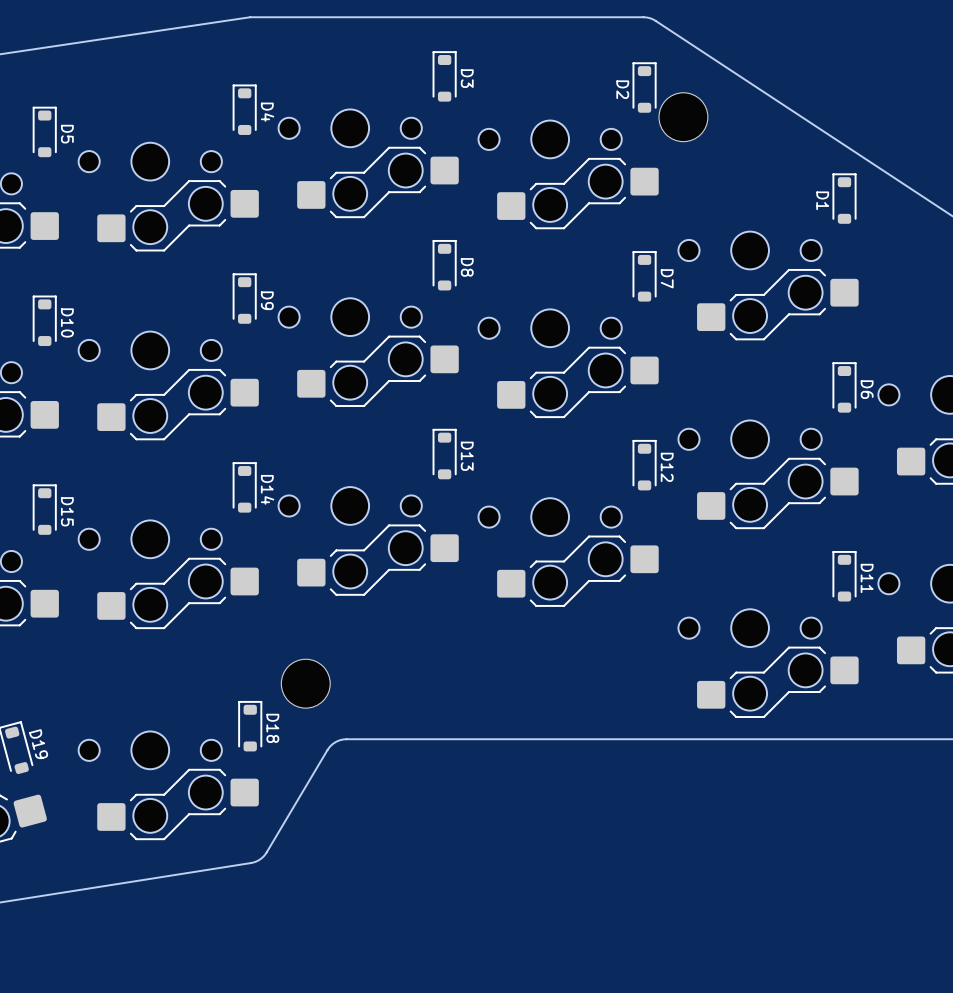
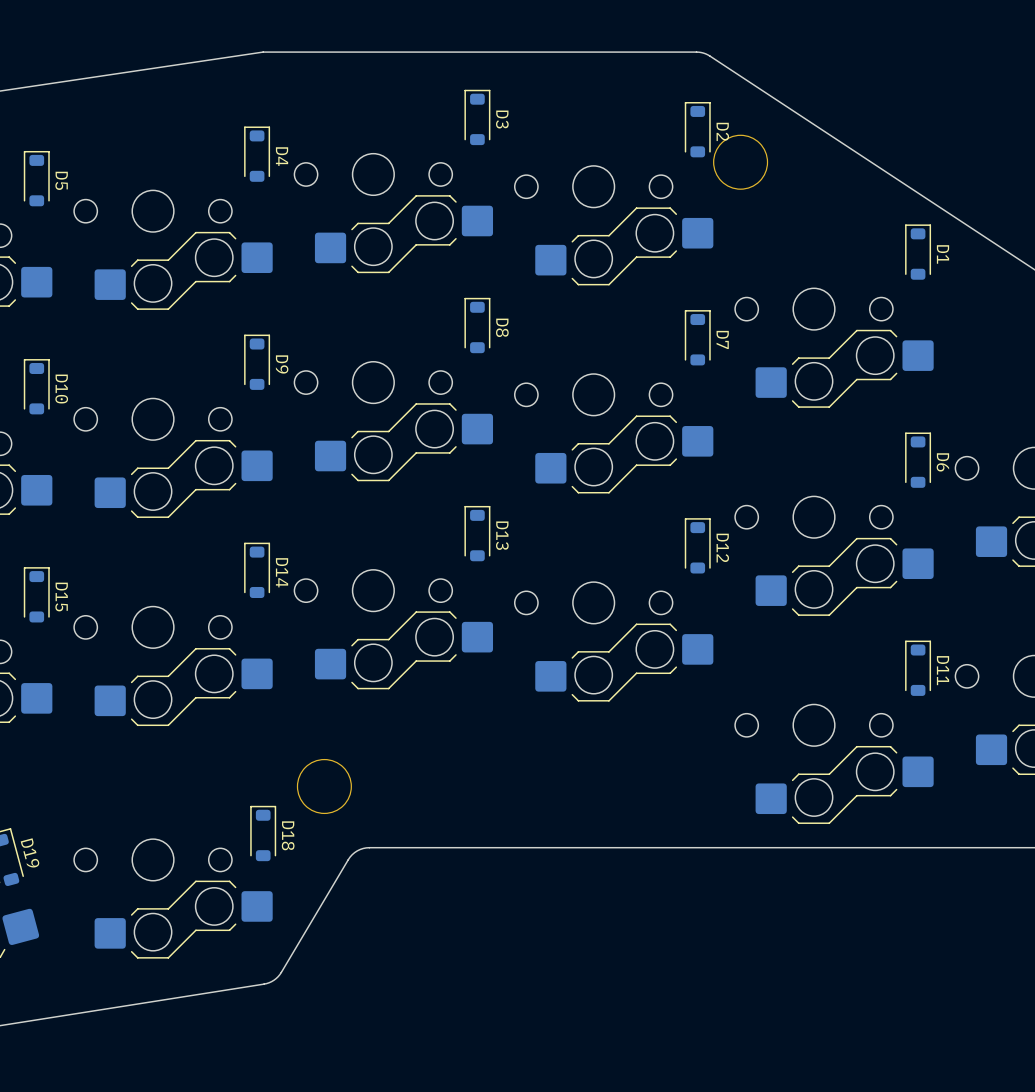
D2 name position: D2 (622, 89) -> D2 (722, 131)
D1 name position: D1 (822, 200) -> D1 (943, 254)

